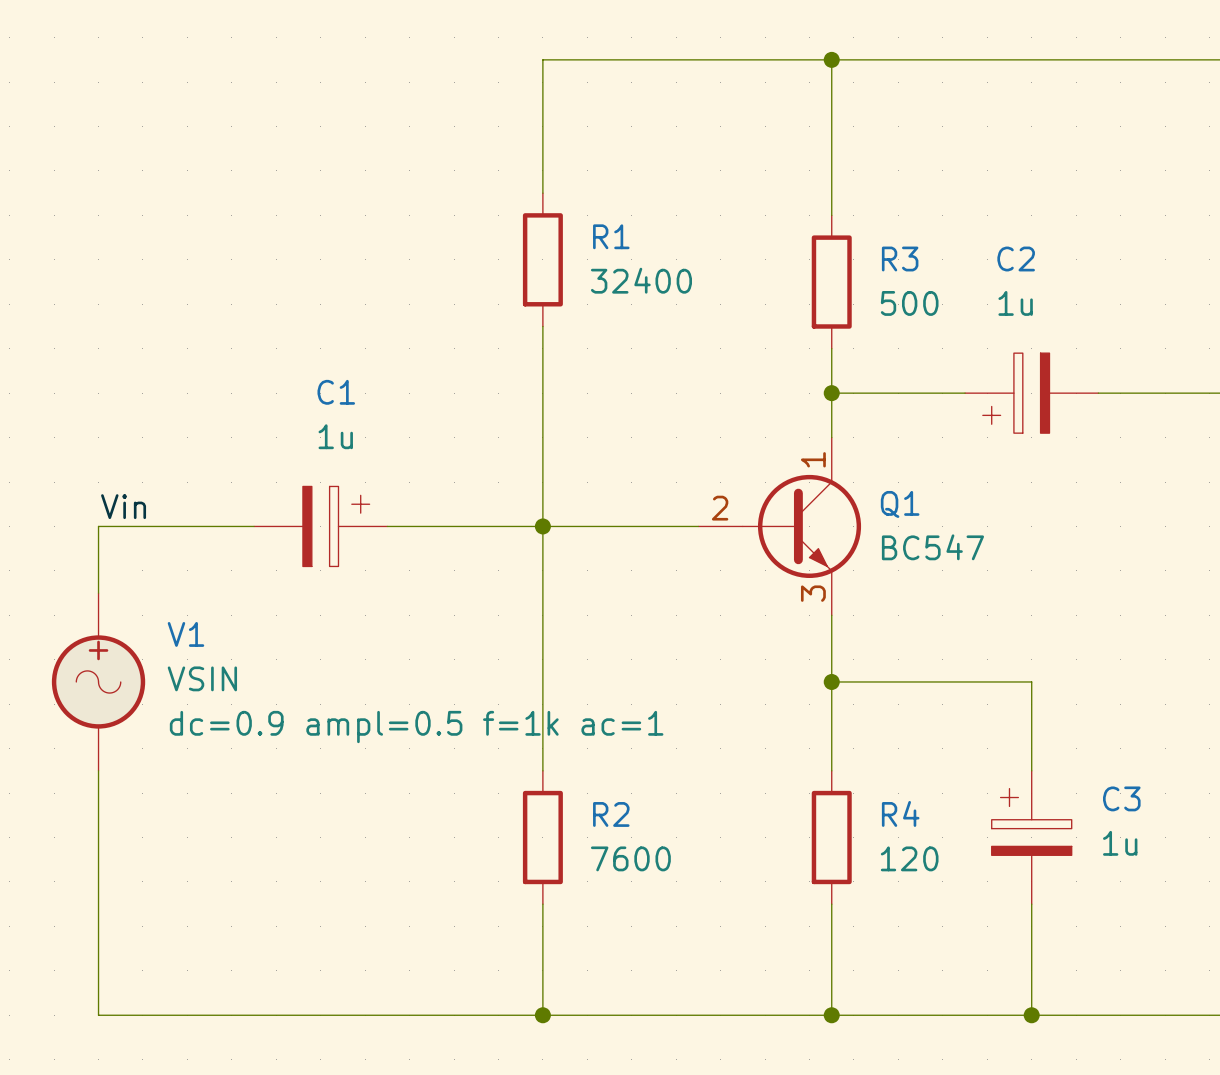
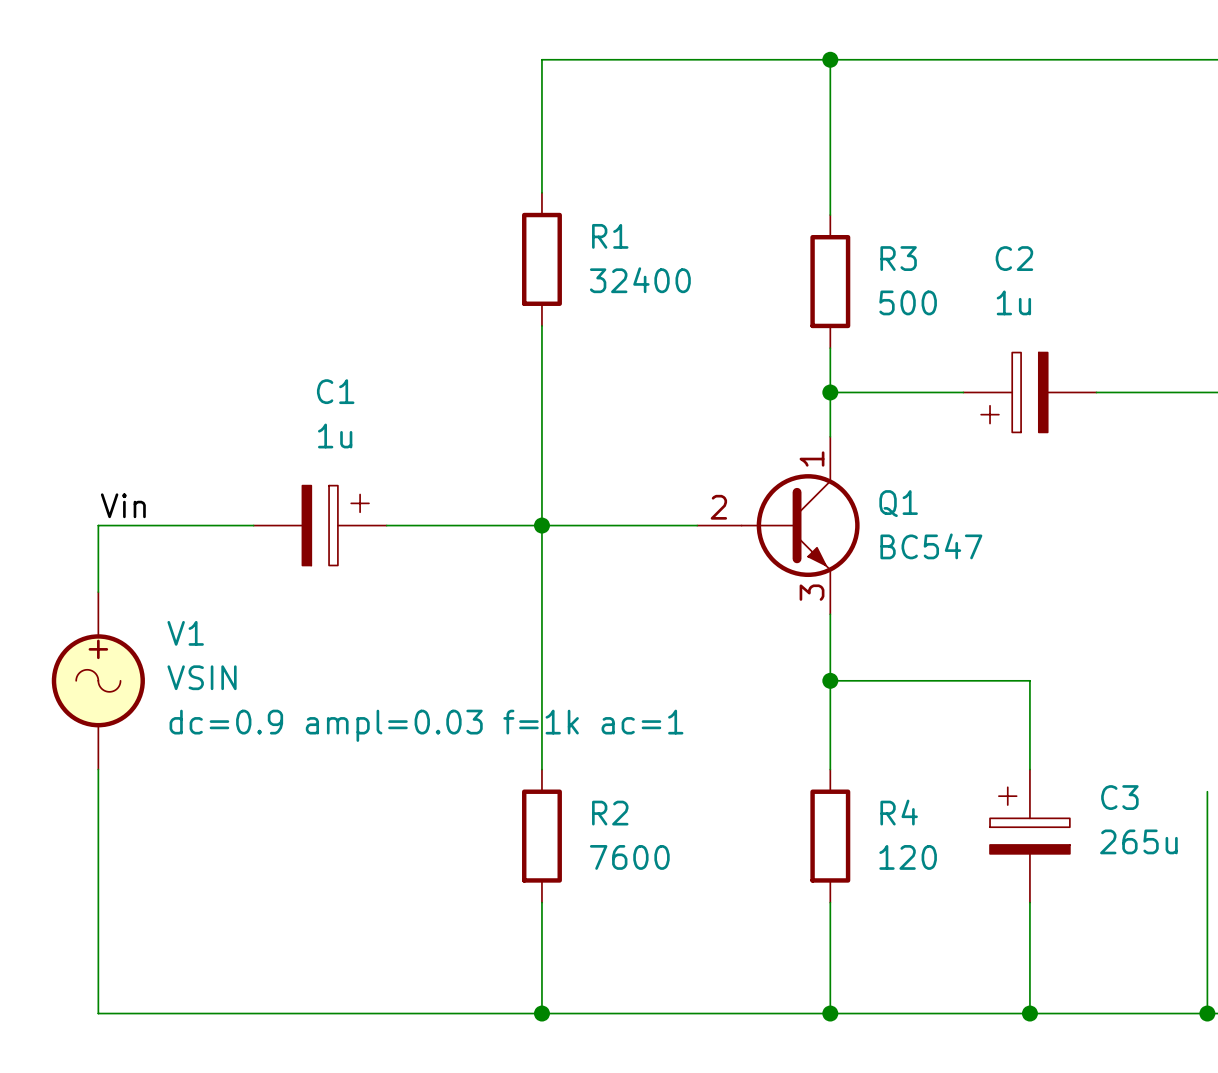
V1 text: dc=0.9 ampl=0.5 f=1k ac=1 (416, 727) -> dc=0.9 ampl=0.03 f=1k ac=1 (426, 725)
wire: none -> (1207, 791) (1207, 1013)
C3 value: 1u (1120, 843) -> 265u (1138, 841)
junction: none -> (1207, 1013)

